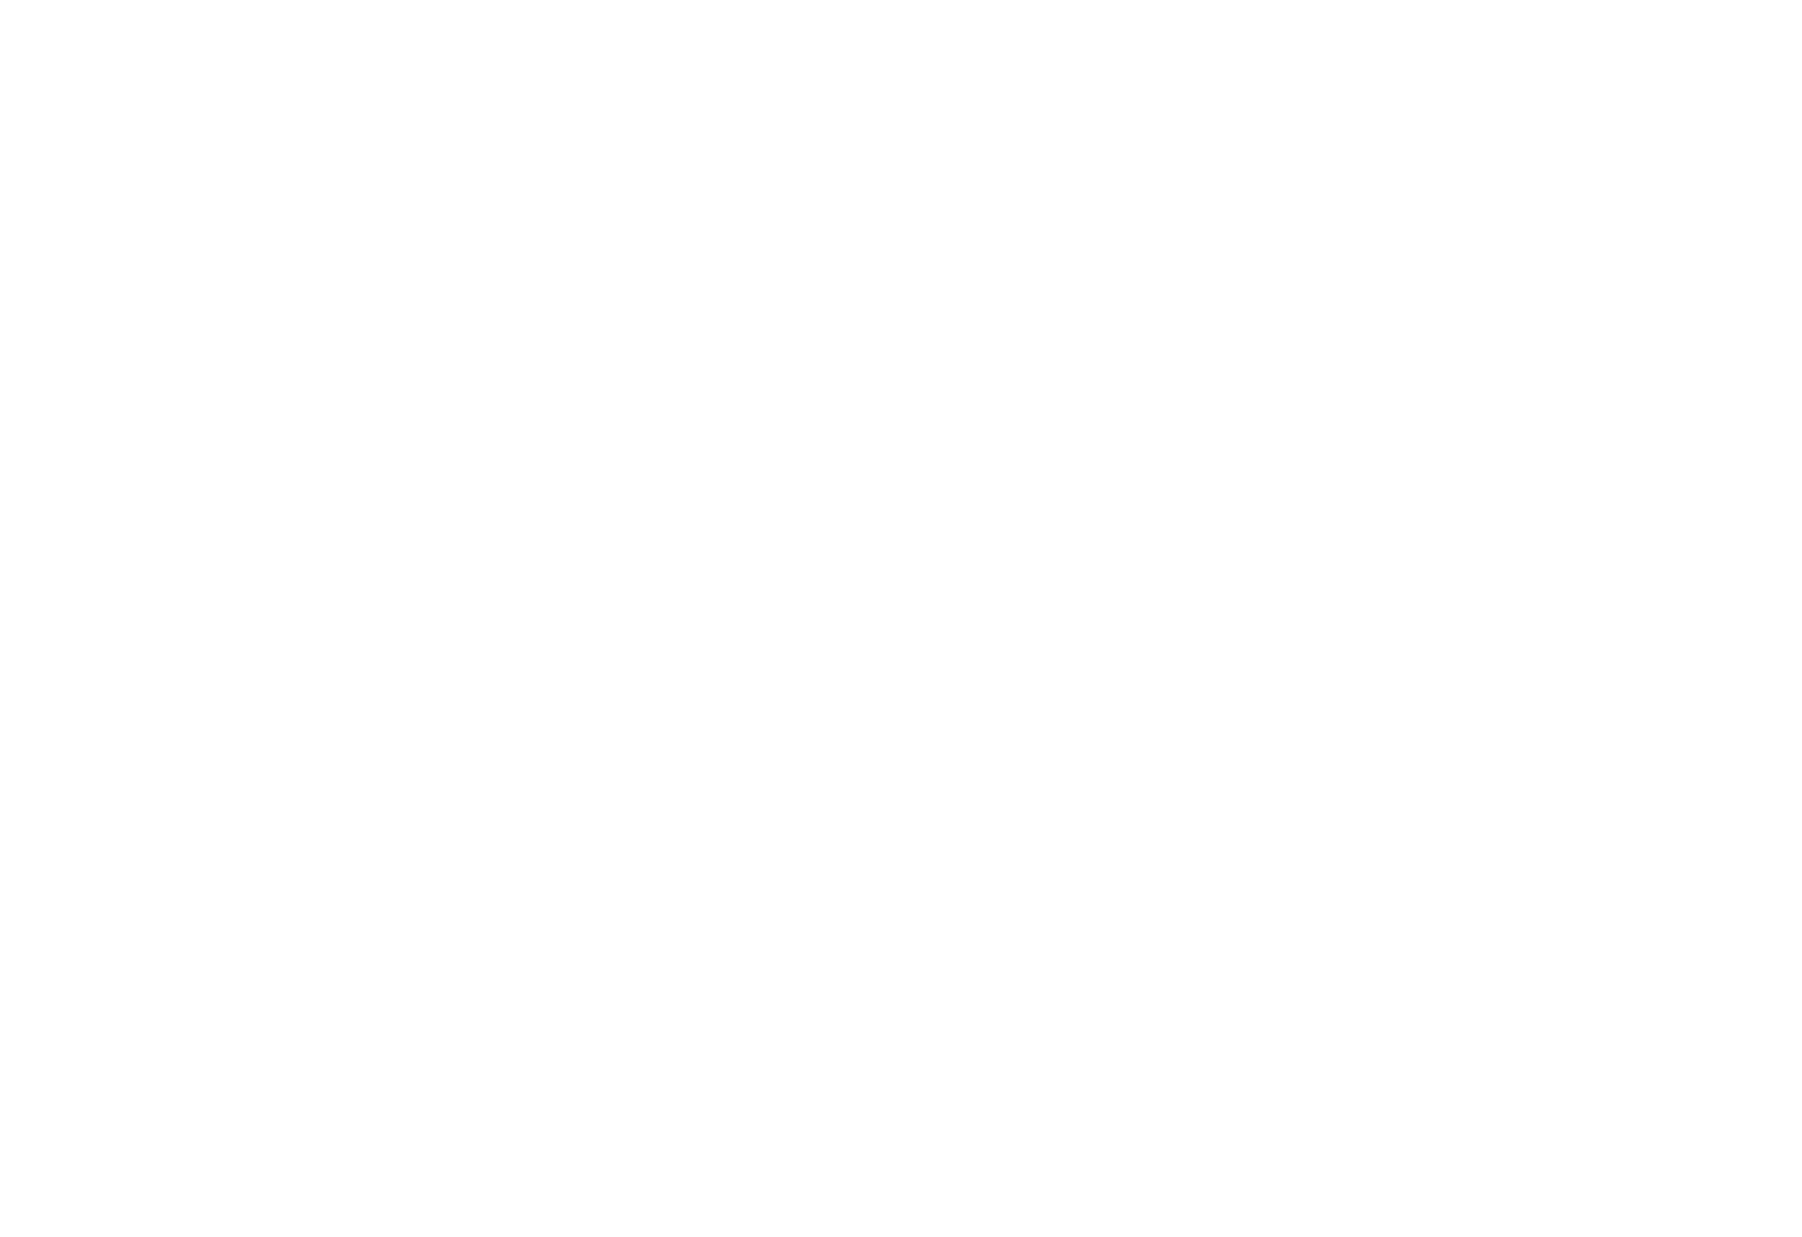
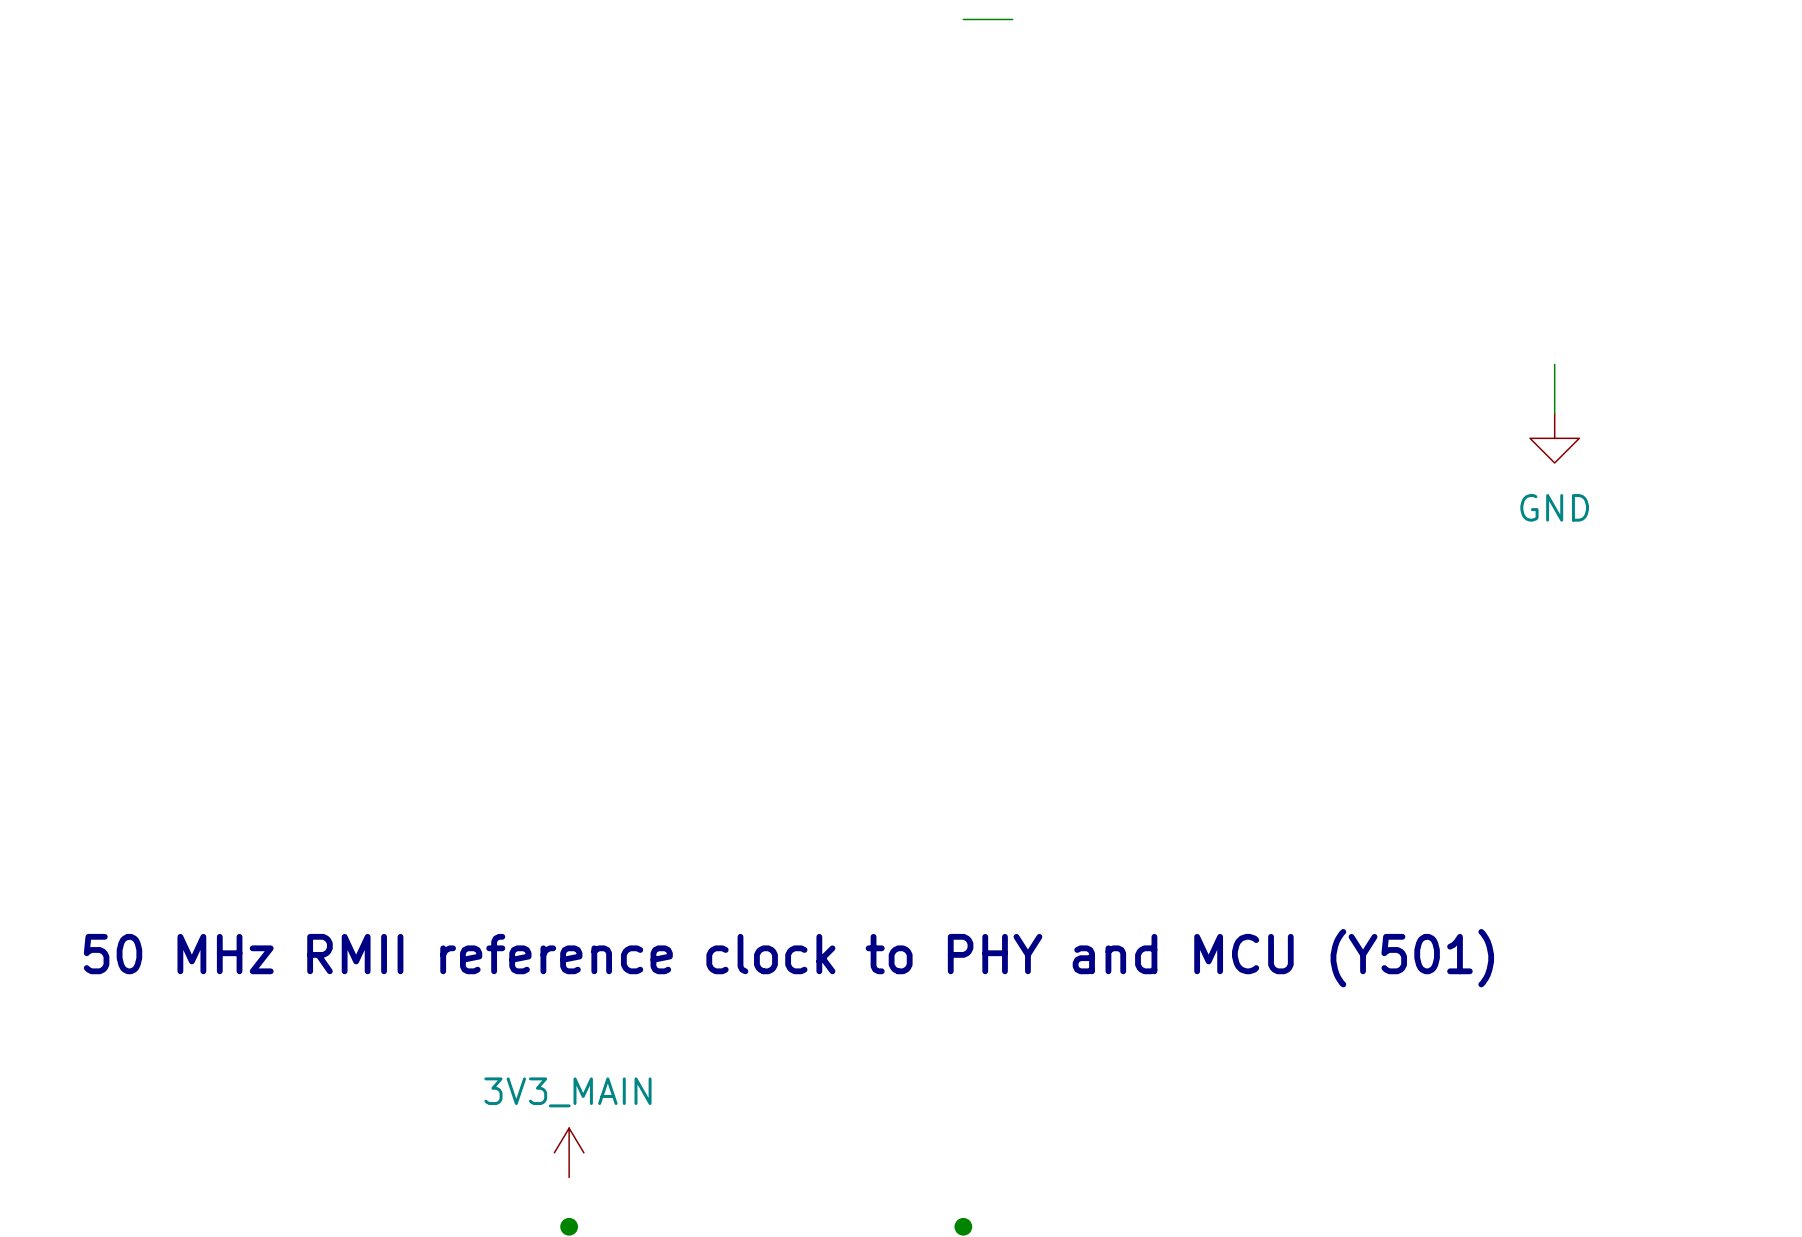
wire: none -> (963, 19) (1012, 19)
wire: none -> (1554, 364) (1554, 413)
power symbol: none -> GND (1554, 438)
text: none -> 50 MHz RMII reference clock to PHY and MCU (Y501) (788, 958)
power symbol: none -> 3V3_MAIN (569, 1152)
junction: none -> (569, 1226)
junction: none -> (963, 1226)

